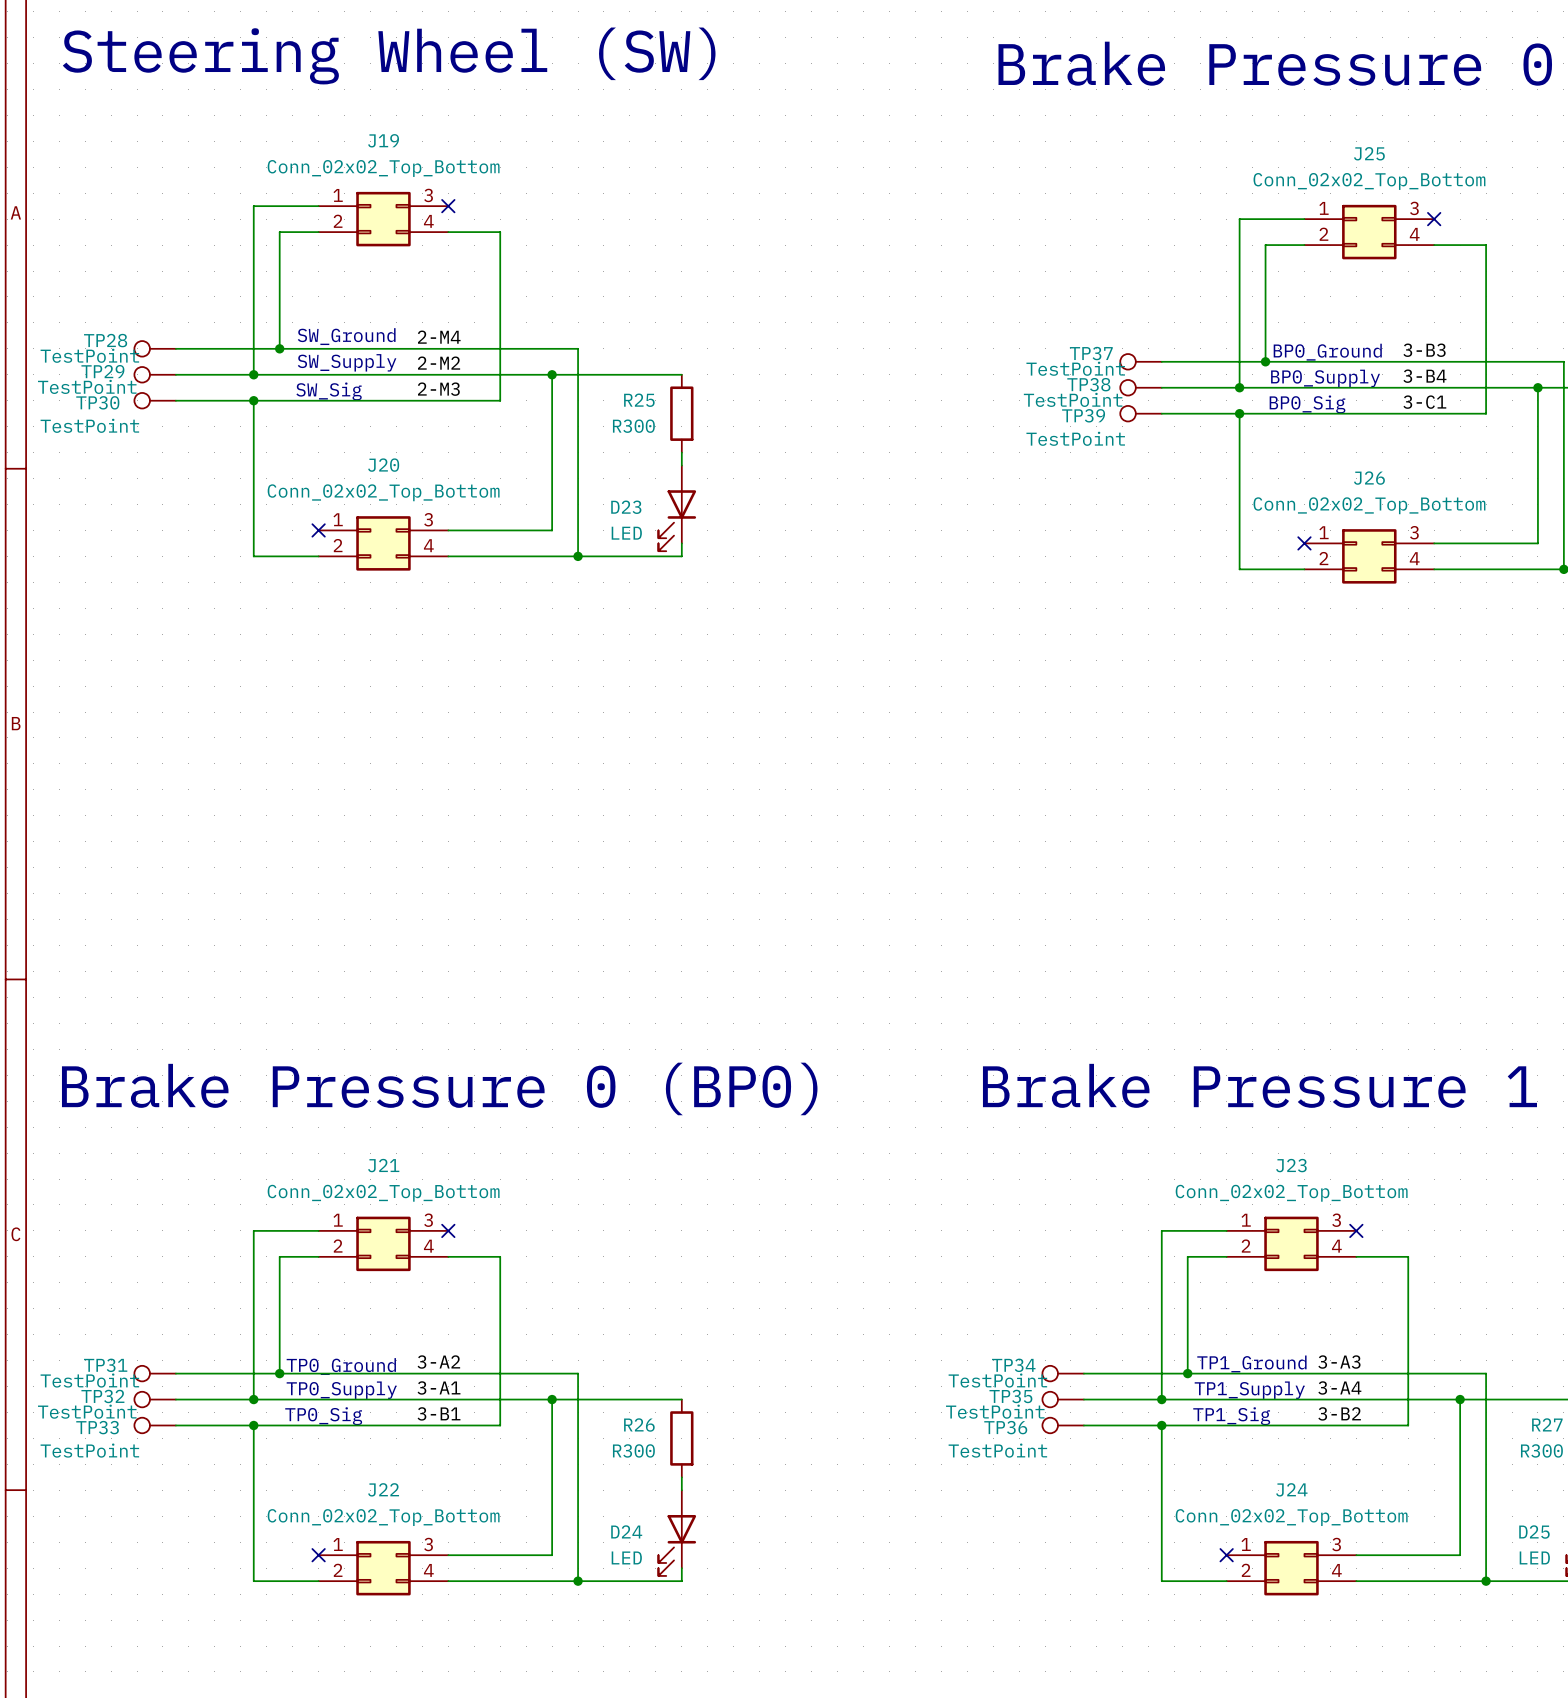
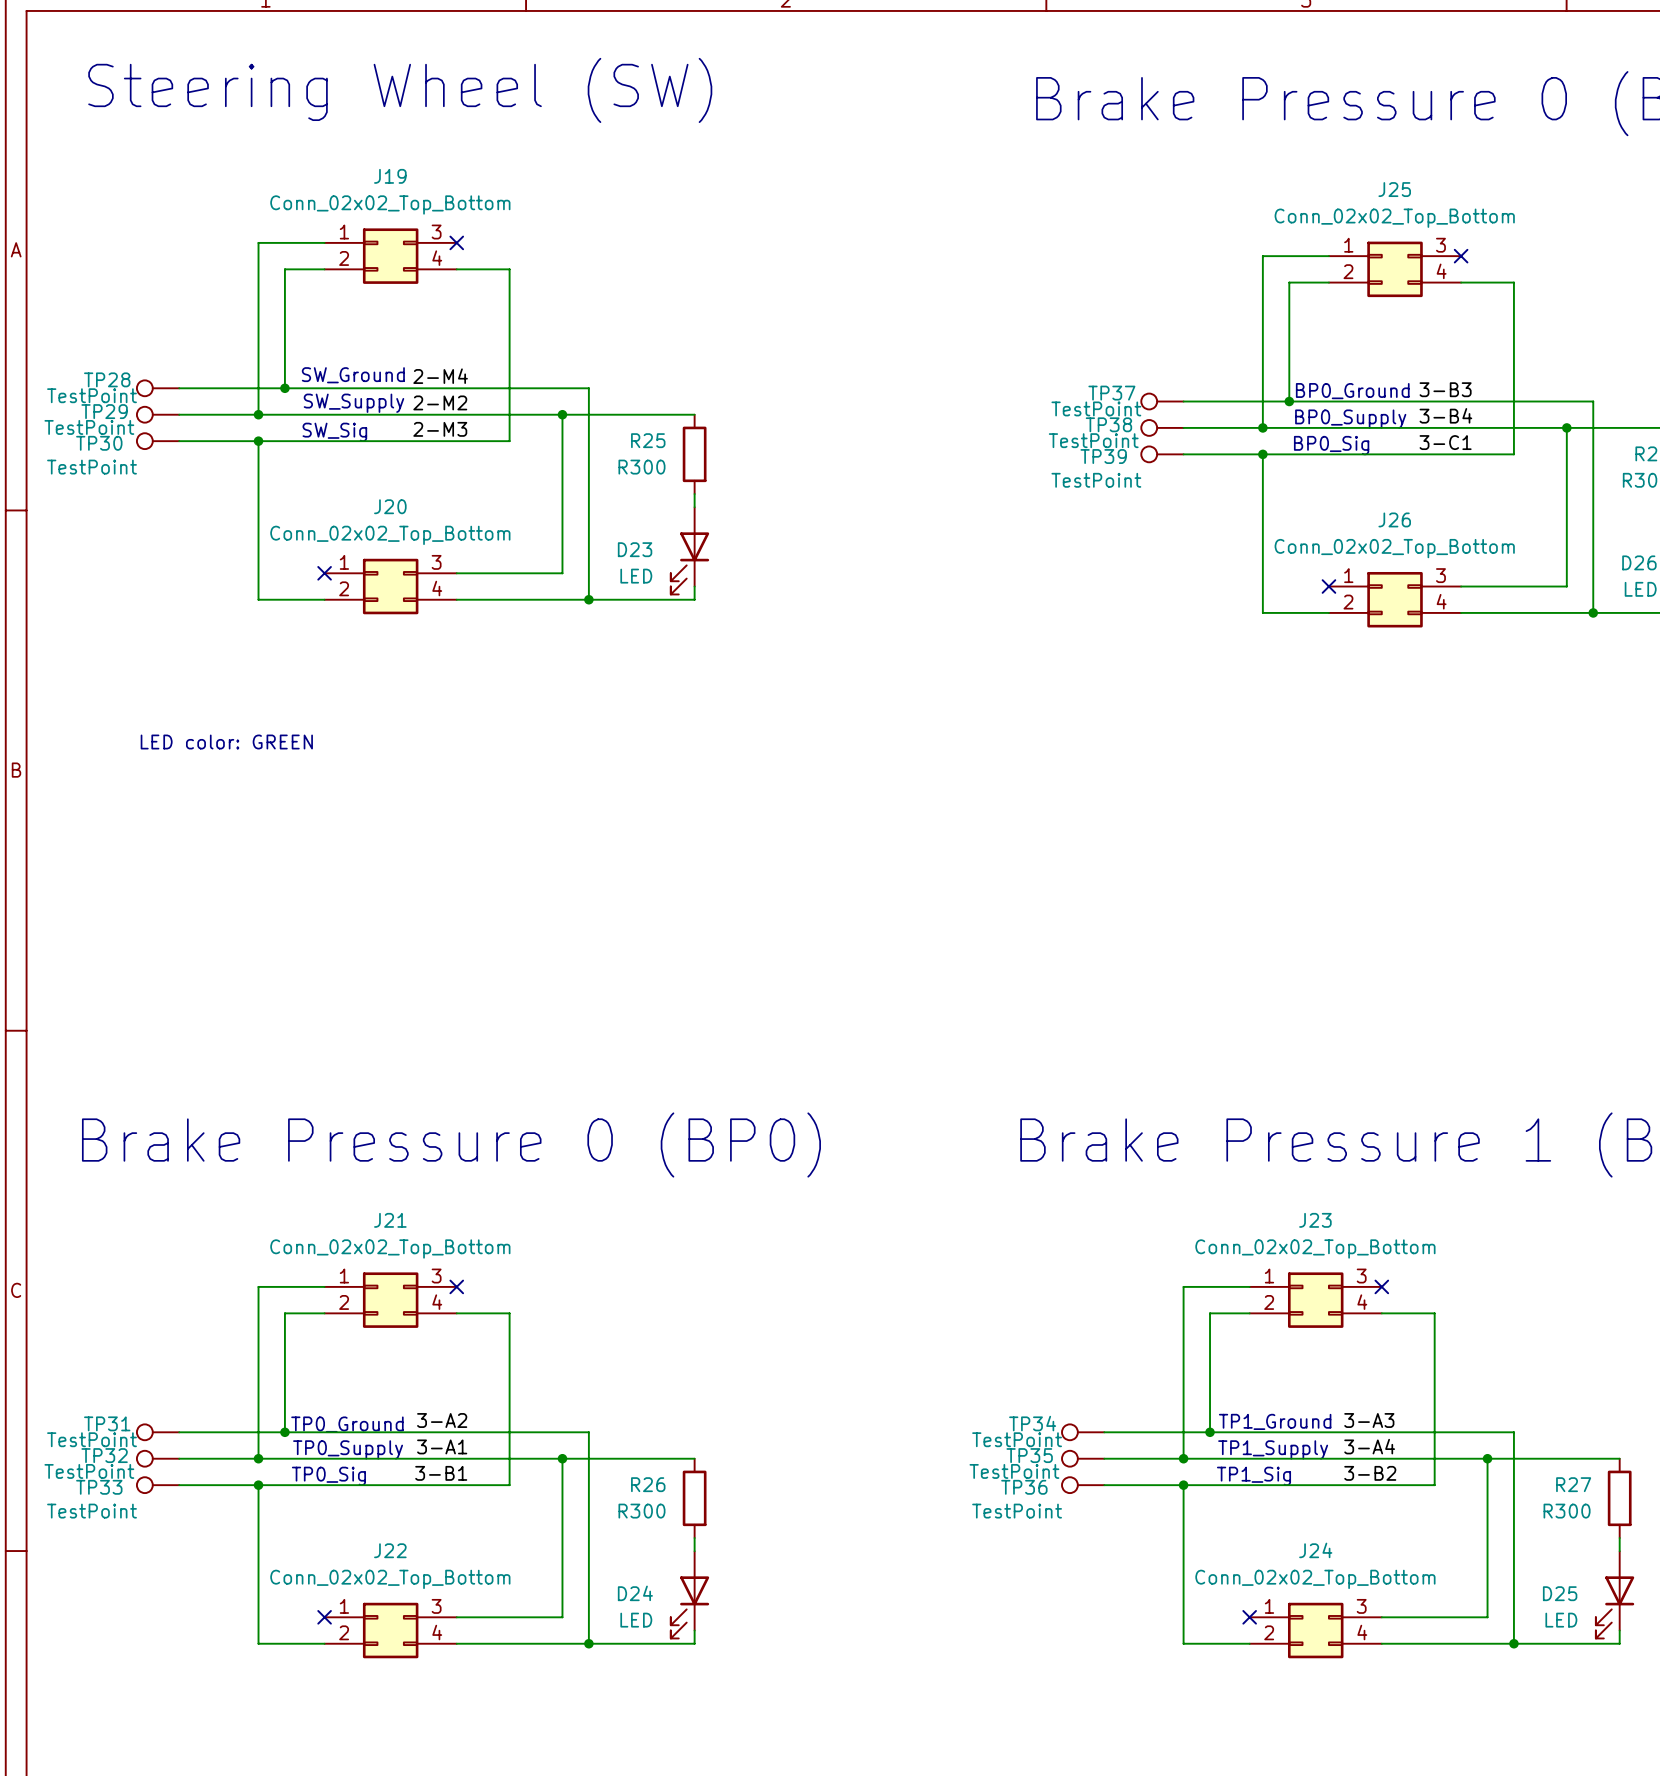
text: none -> LED color: GREEN (226, 742)

